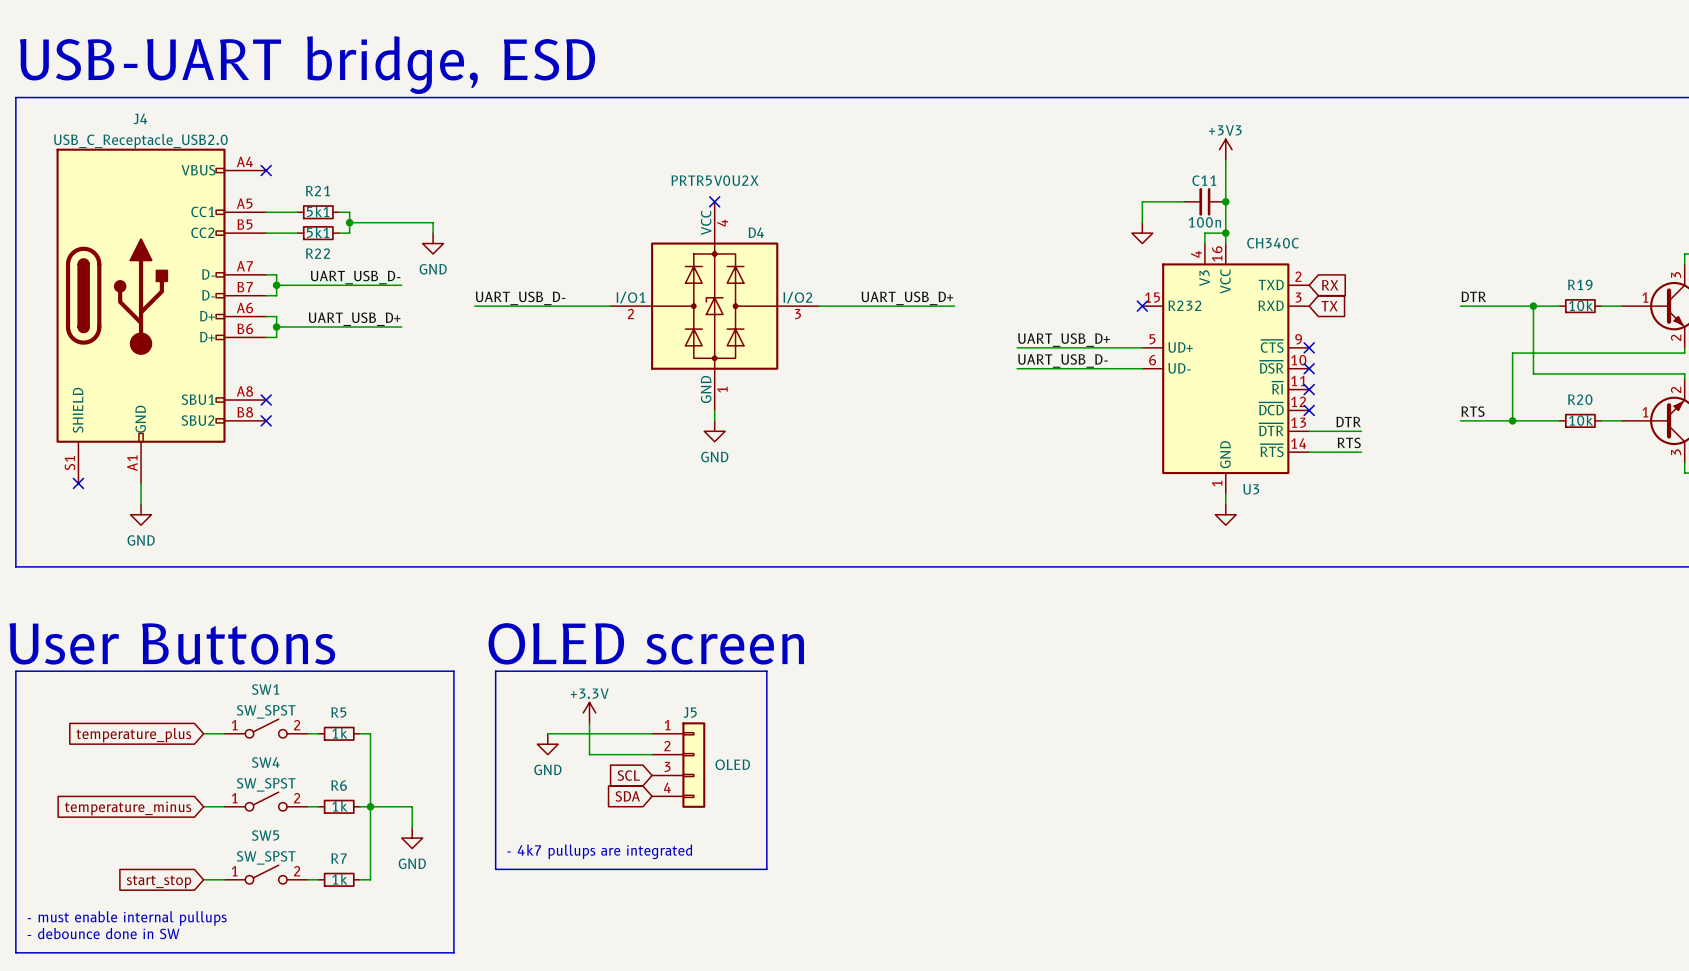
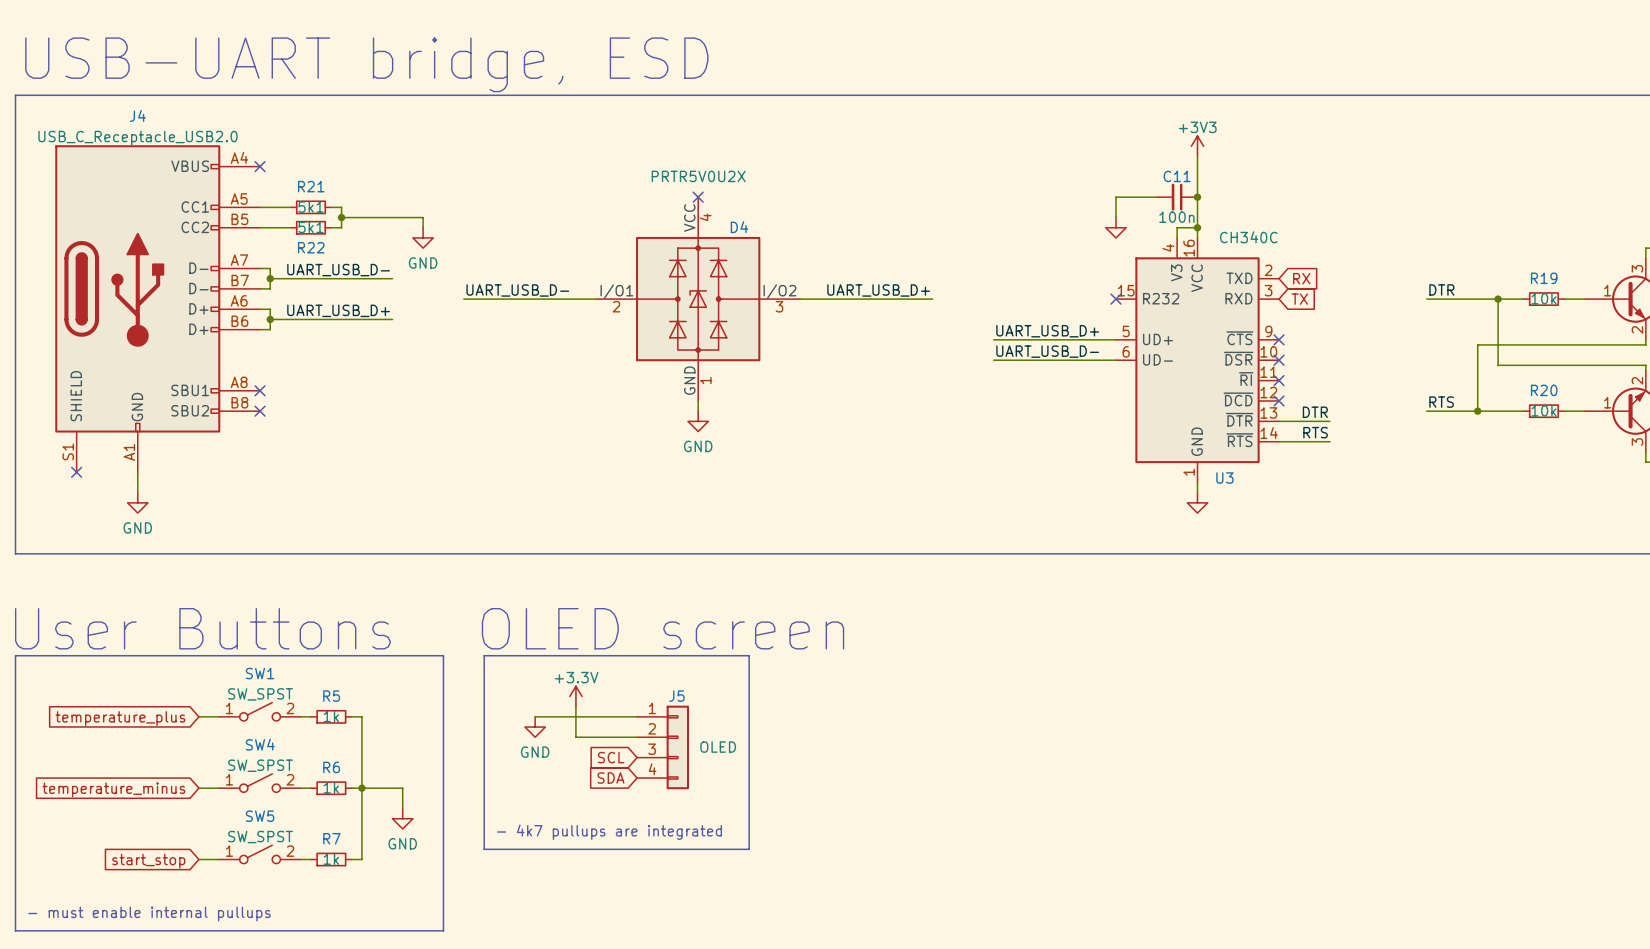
text: - must enable internal pullups (127, 918) -> none
text: - debounce done in SW (103, 933) -> - must enable internal pullups (149, 914)

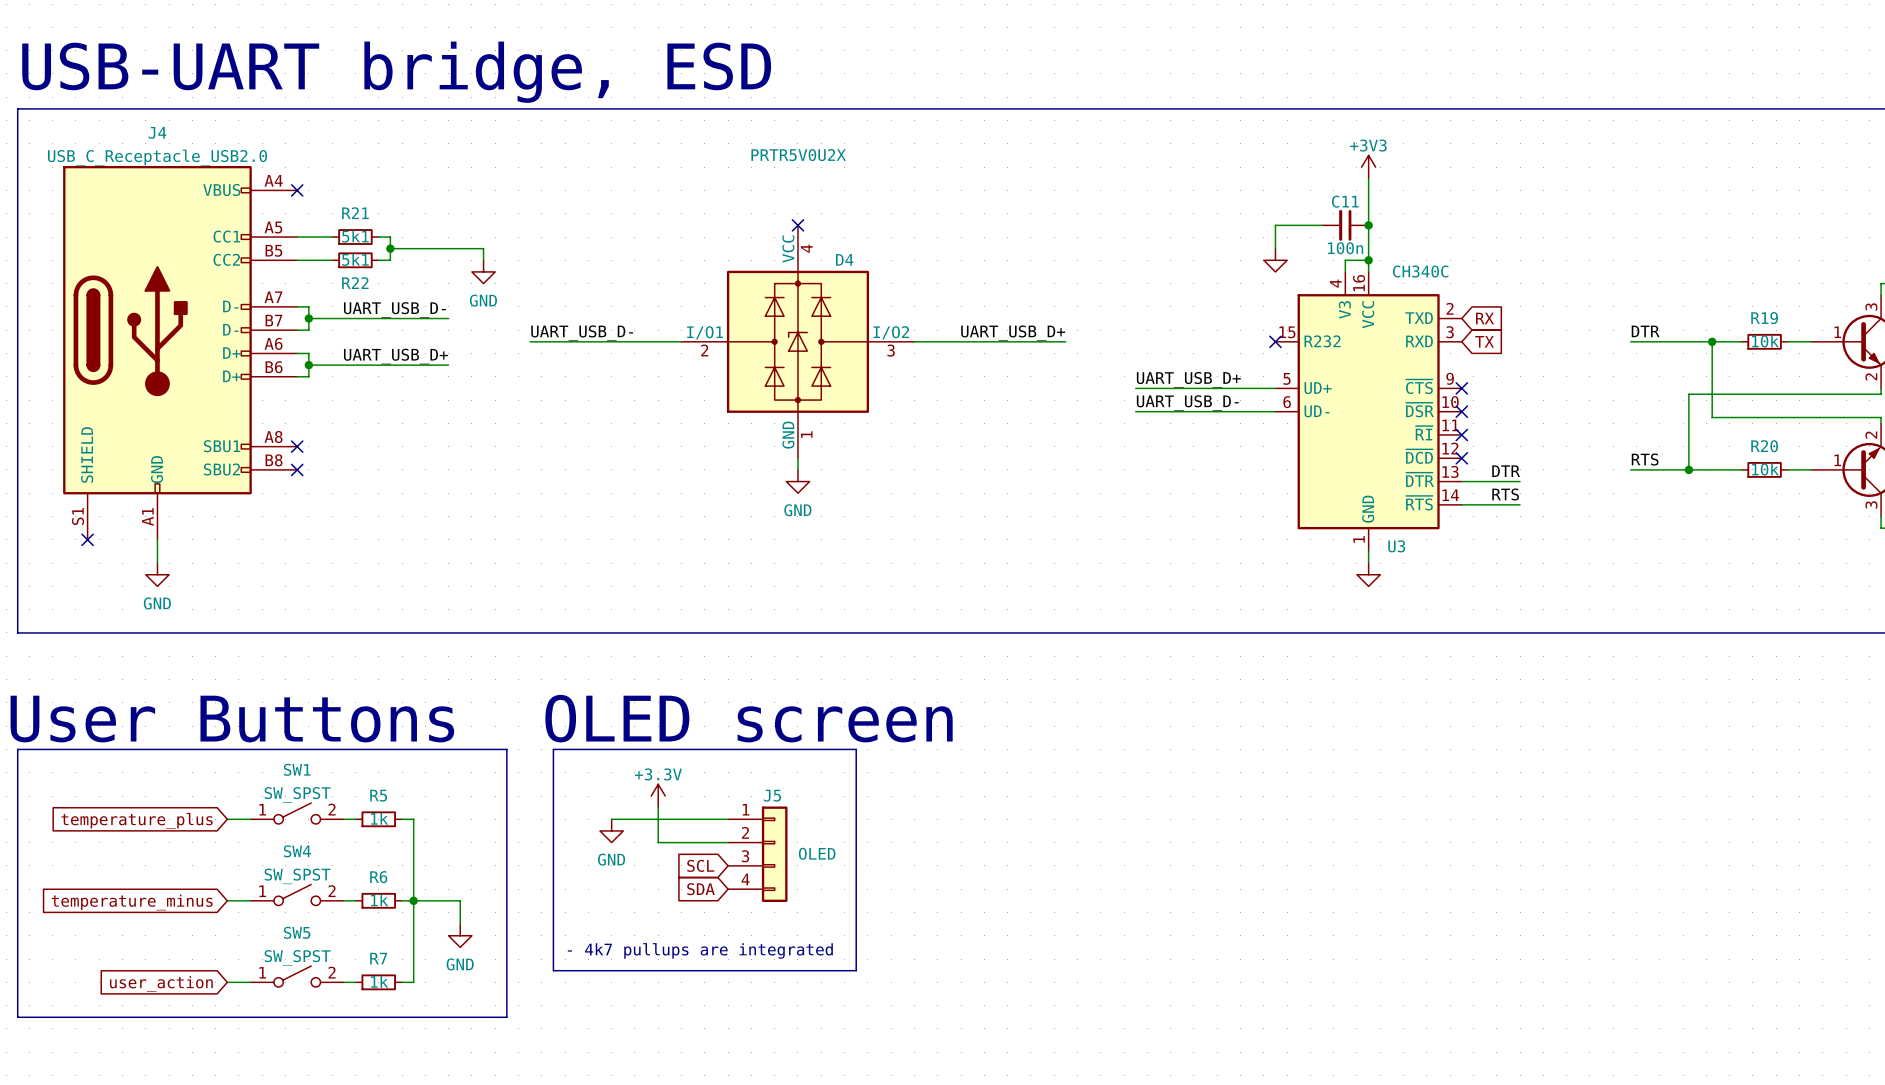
D4 value position: PRTR5V0U2X (698, 176) -> PRTR5V0U2X (798, 155)
global label: start_stop (148, 861) -> user_action (161, 983)
line: (15, 890) (15, 930) (443, 930) (443, 890) -> (17, 1017) (506, 1017)
text: - must enable internal pullups (149, 914) -> none

